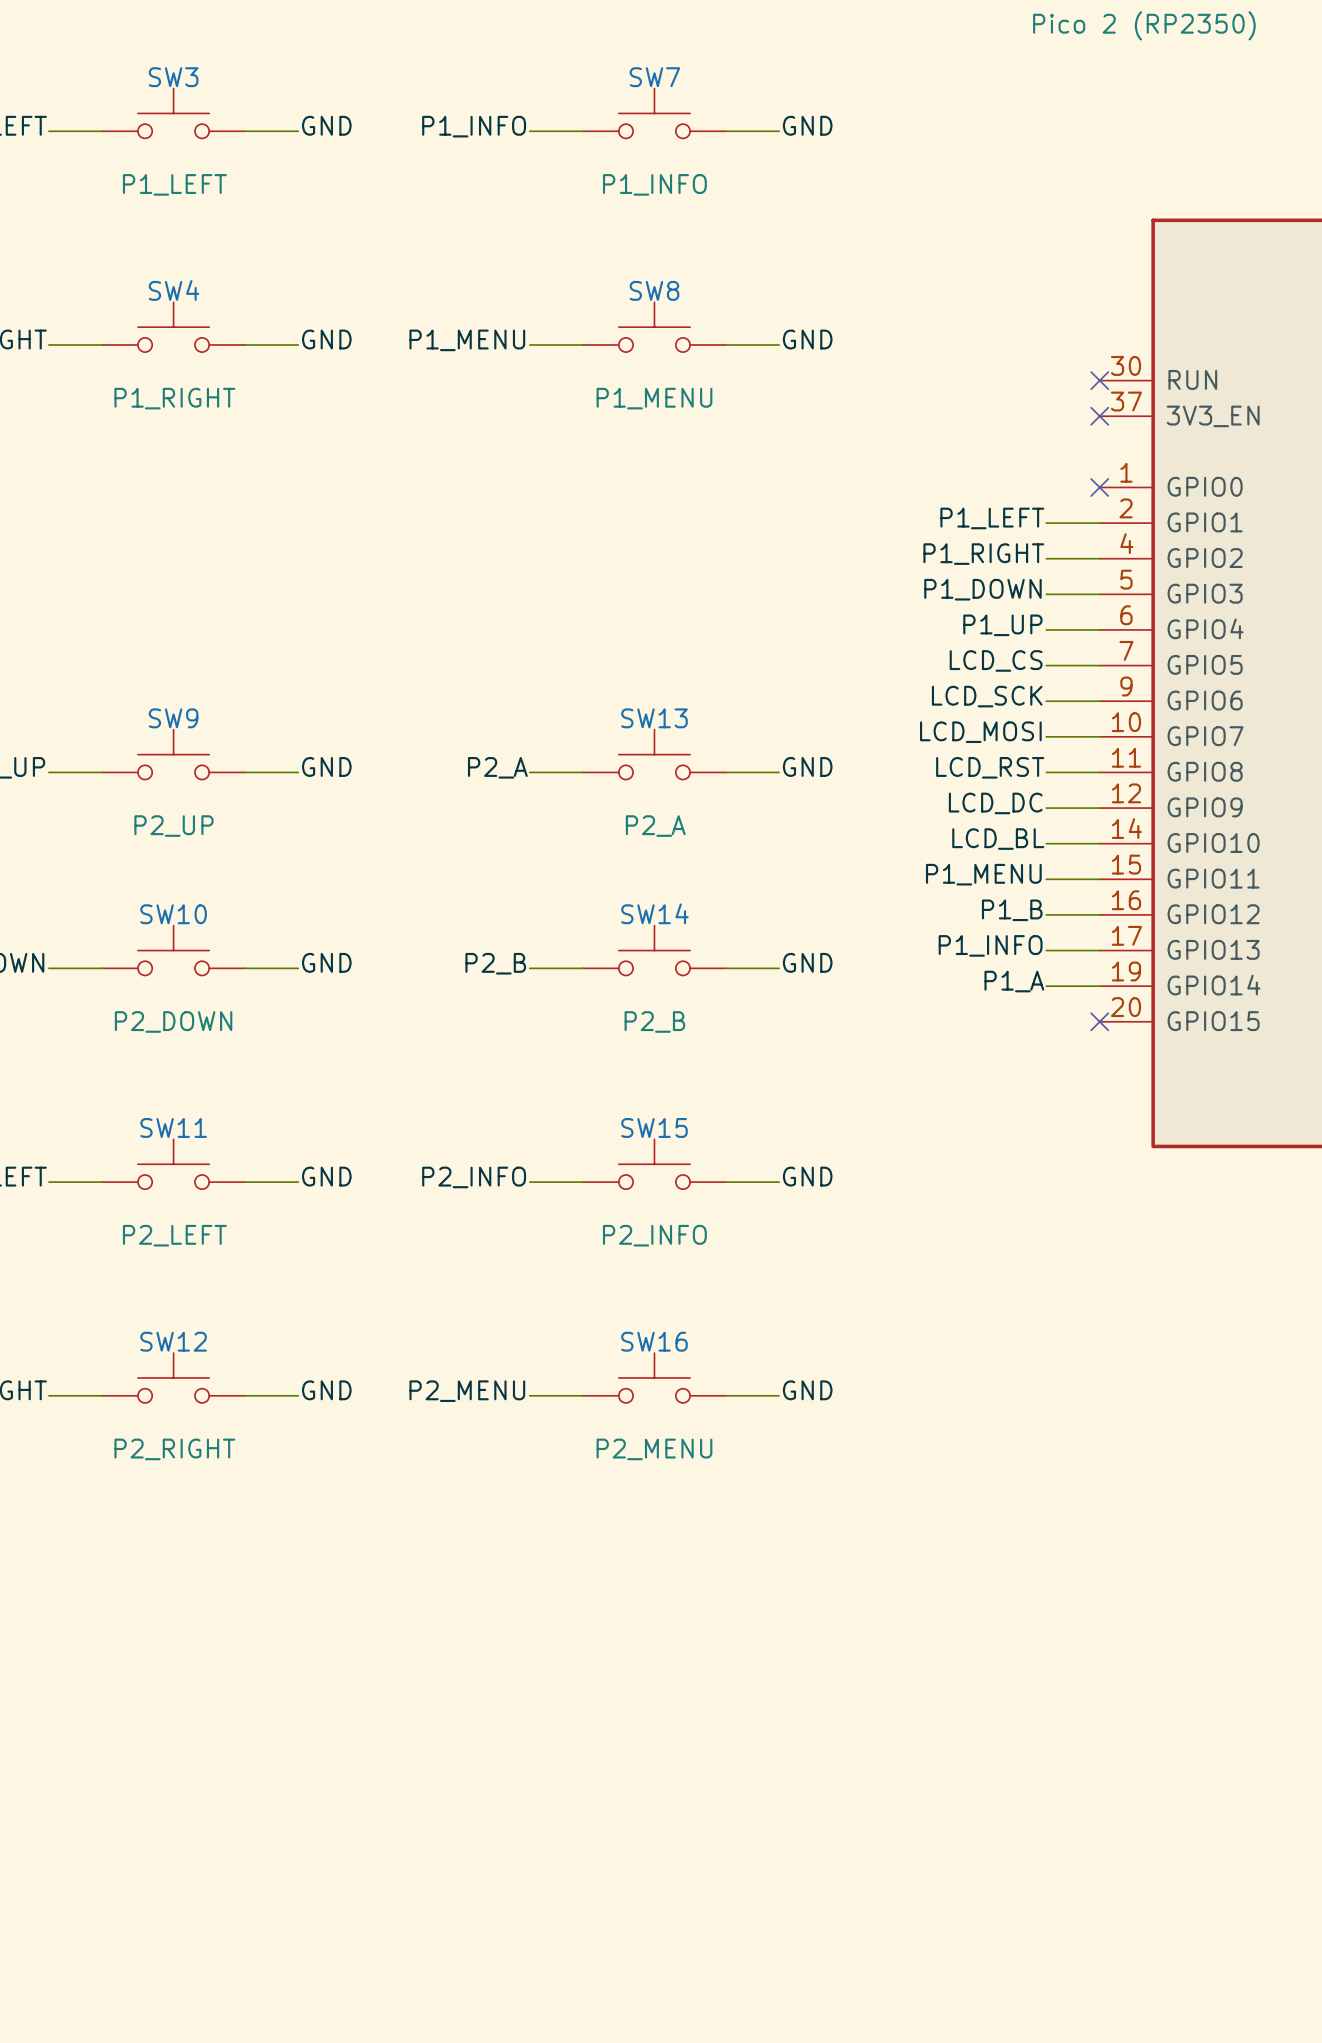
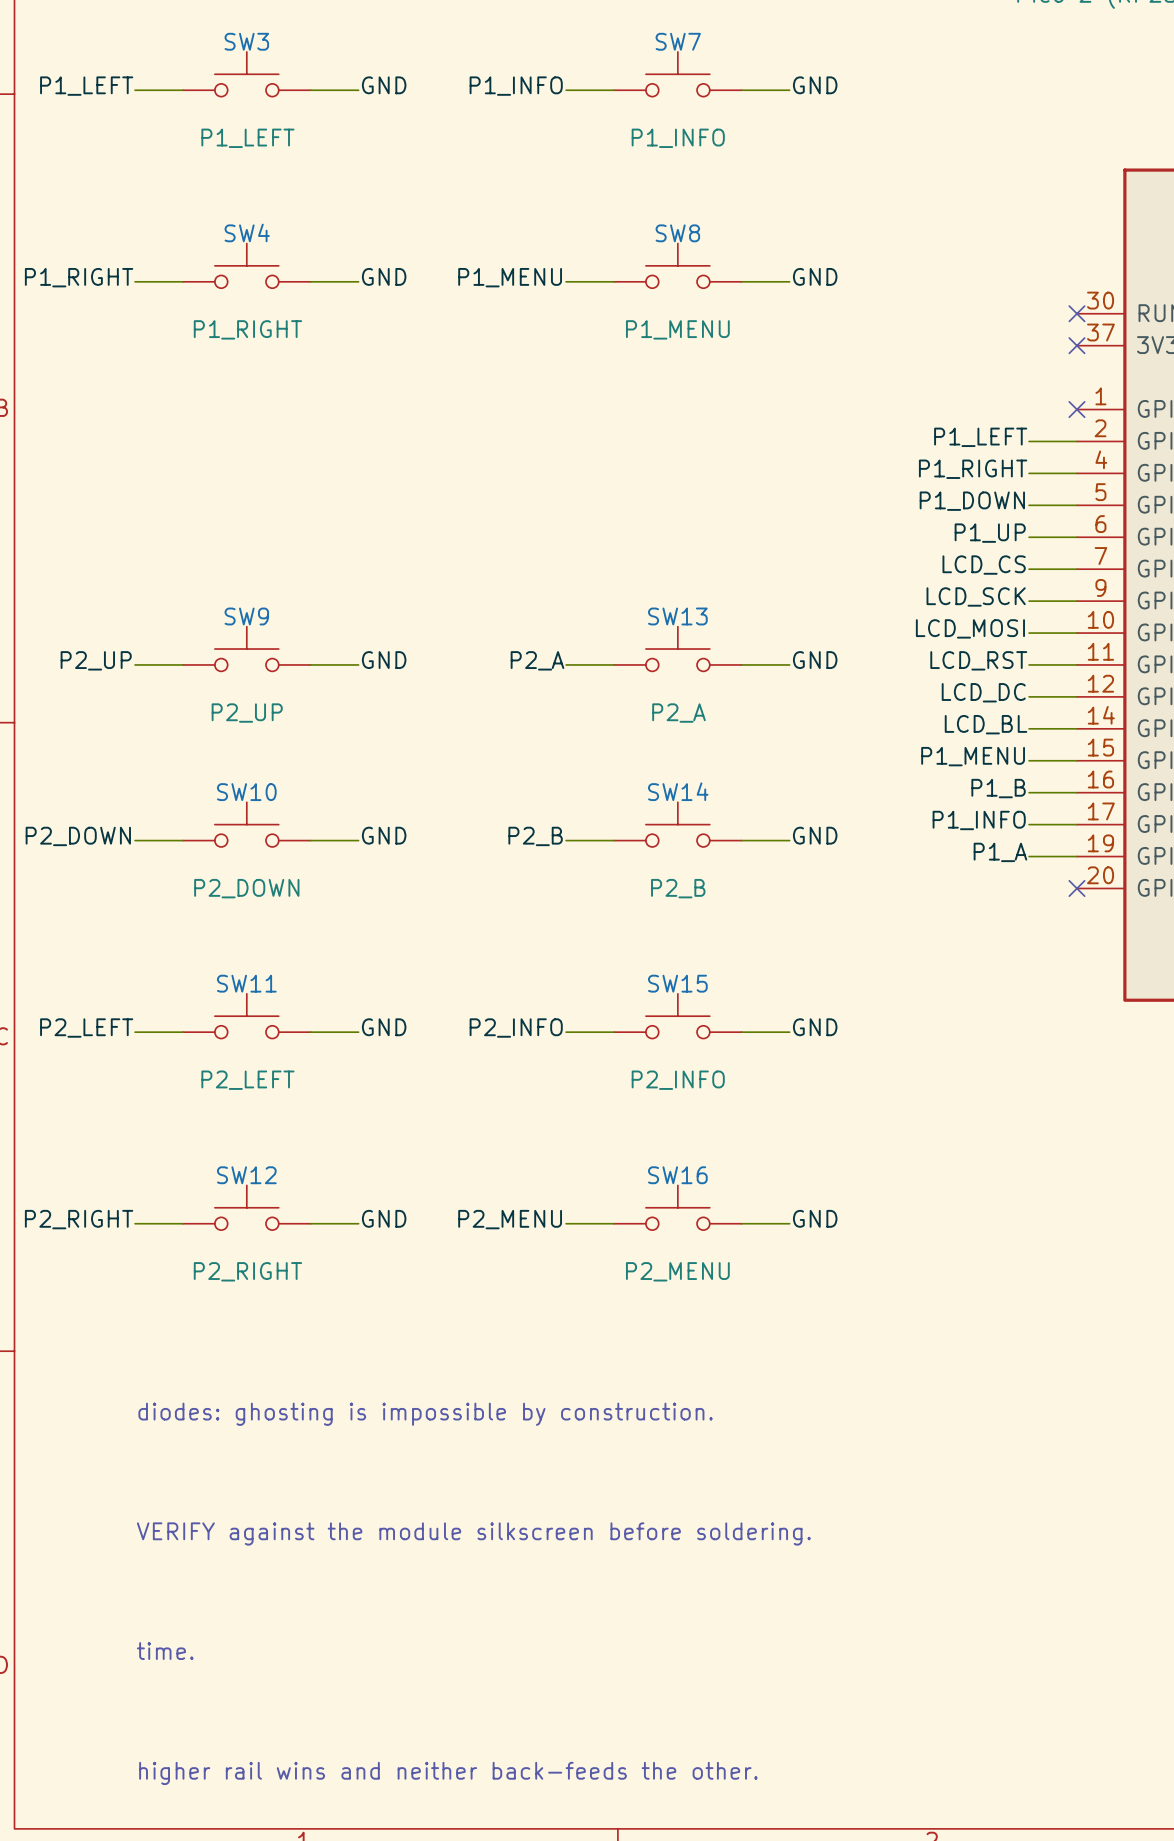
text: none -> diodes: ghosting is impossible by construction. (425, 1414)
text: none -> VERIFY against the module silkscreen before soldering. (473, 1533)
text: none -> time. (165, 1651)
text: none -> higher rail wins and neither back-feeds the other. (448, 1773)

